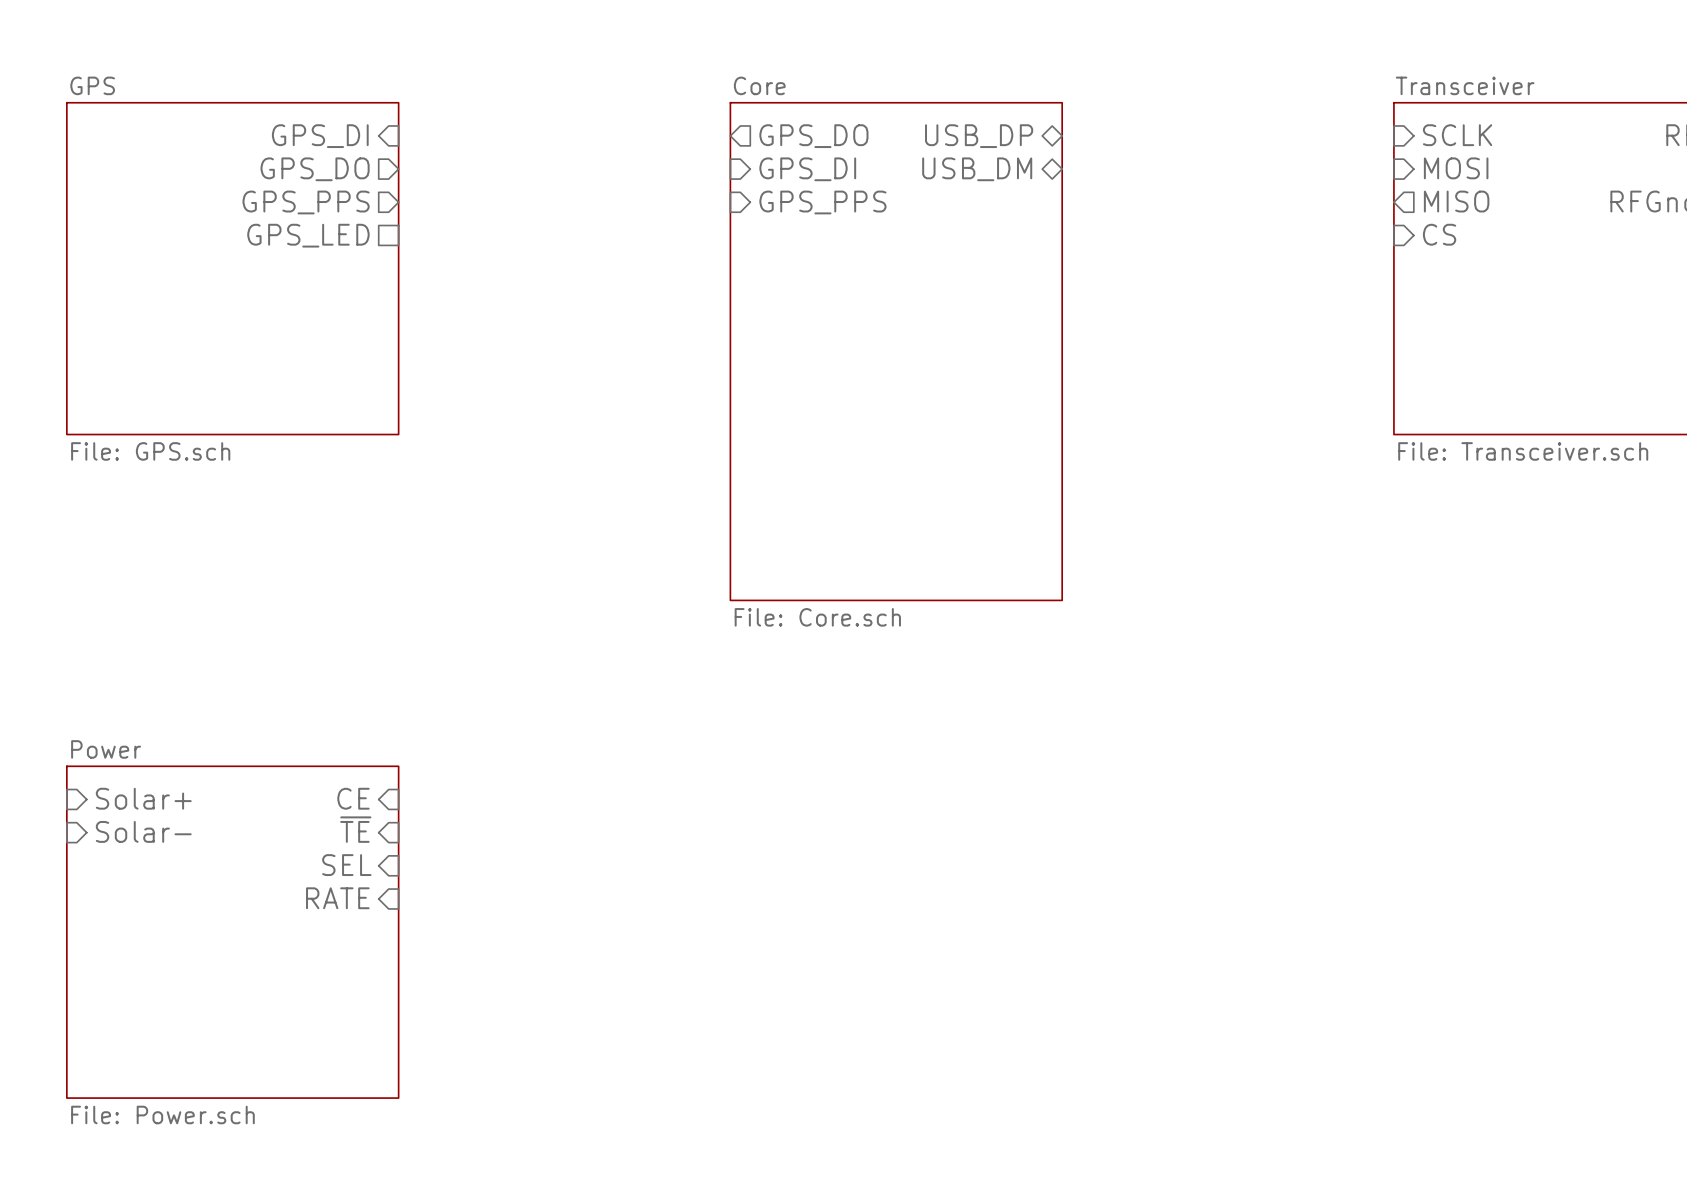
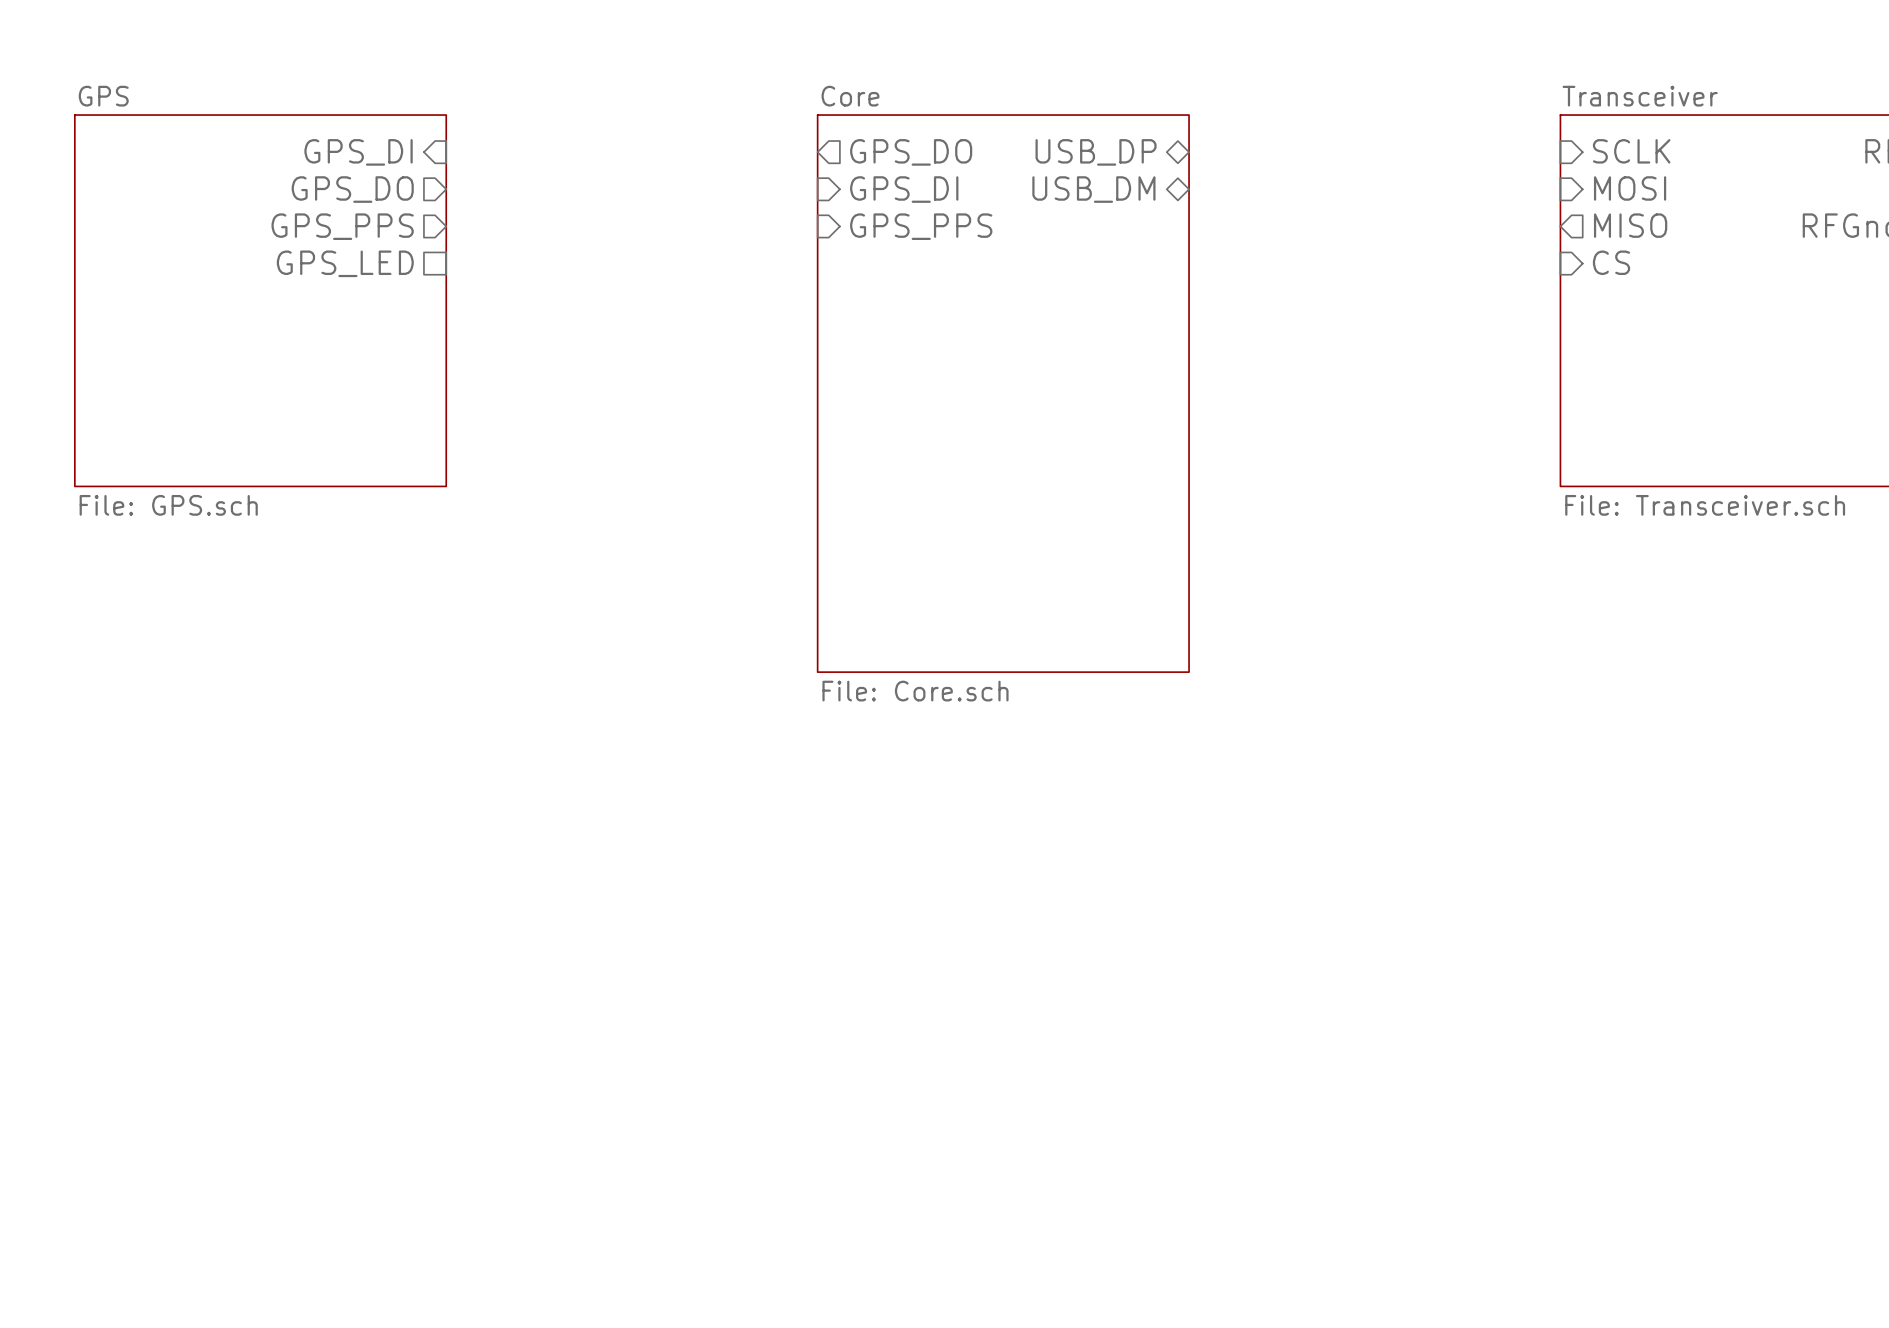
sheet pin: Solar+ (143, 798) -> none
sheet pin: CE (353, 798) -> none
sheet pin: ~{TE} (355, 829) -> none
sheet pin: Solar- (143, 831) -> none
sheet pin: SEL (346, 865) -> none
sheet pin: RATE (337, 898) -> none
sheet Power: File: Power.sch (232, 932) -> none

